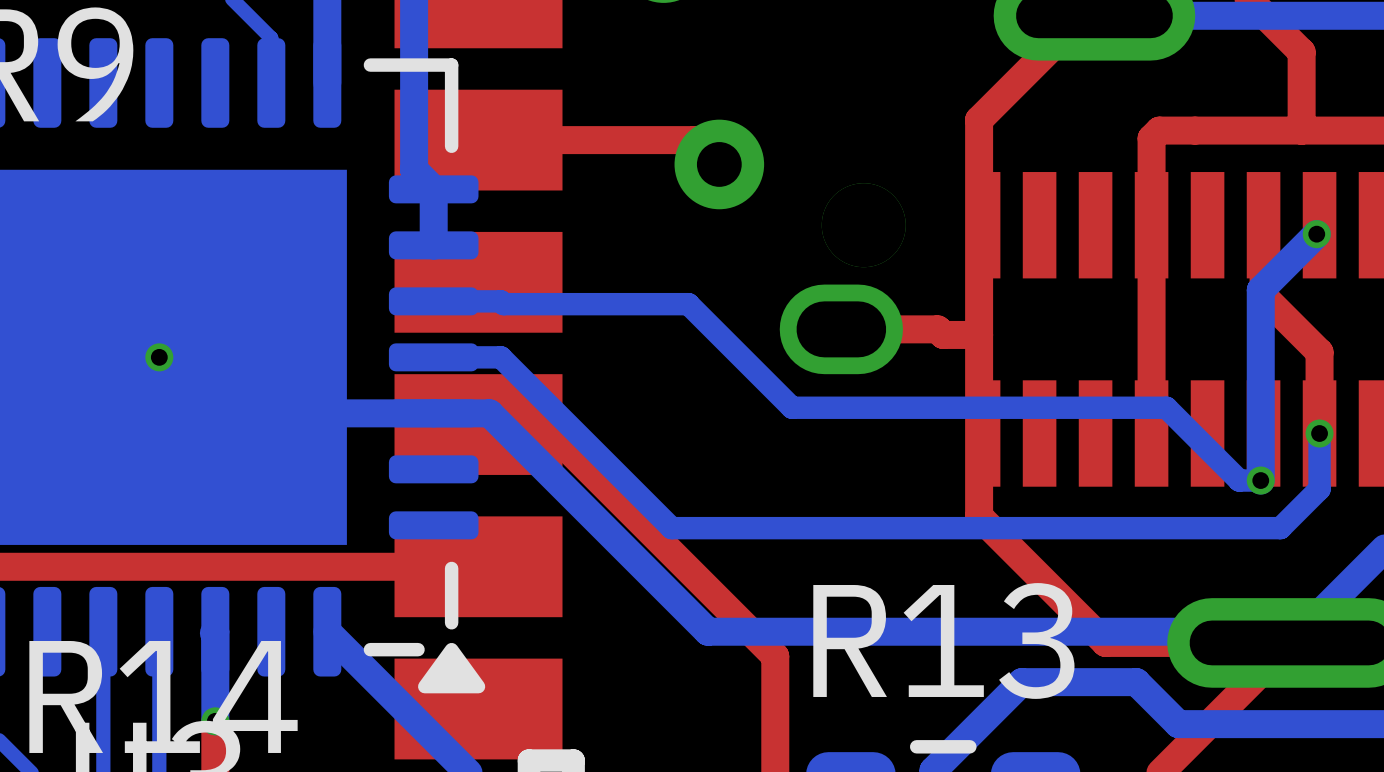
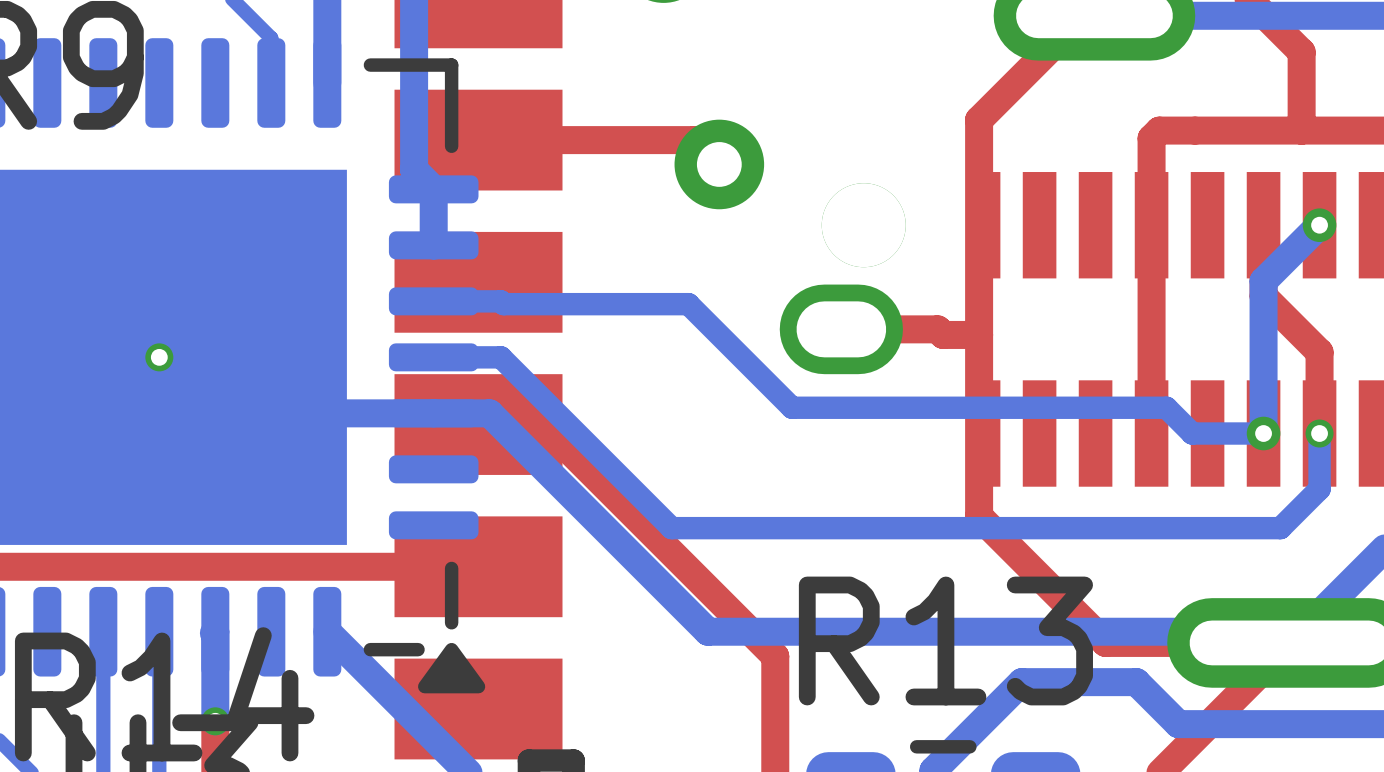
via size: [1302, 220, 1331, 249] -> [1302, 208, 1337, 243]
bottom track: (1316, 234) (1260, 290) (1260, 480) (1239, 480) (1192, 433) -> (1319, 225) (1263, 281) (1263, 433) (1192, 433)
via: none -> (1263, 433)
via: (1260, 480) -> none

